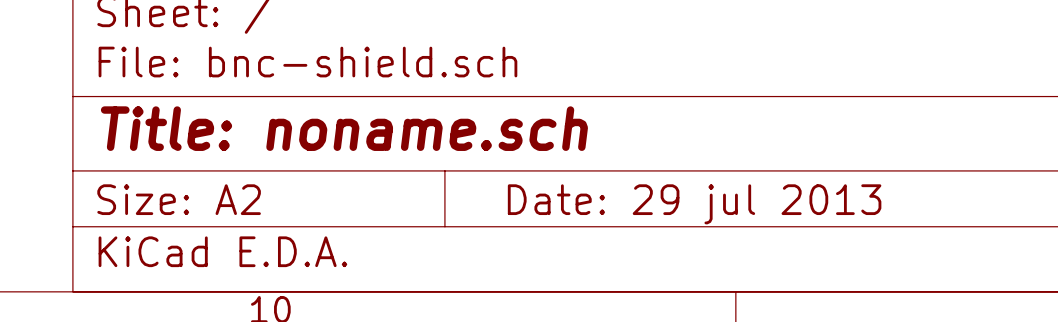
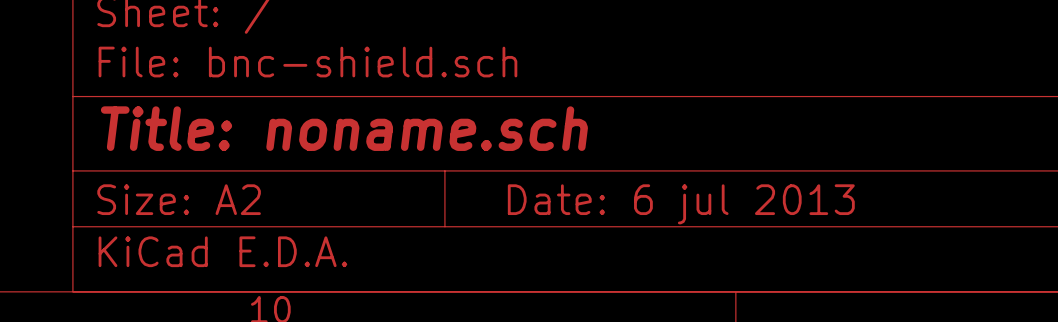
title block: Date: 29 jul 2013 (694, 204) -> Date: 6 jul 2013 (681, 204)

